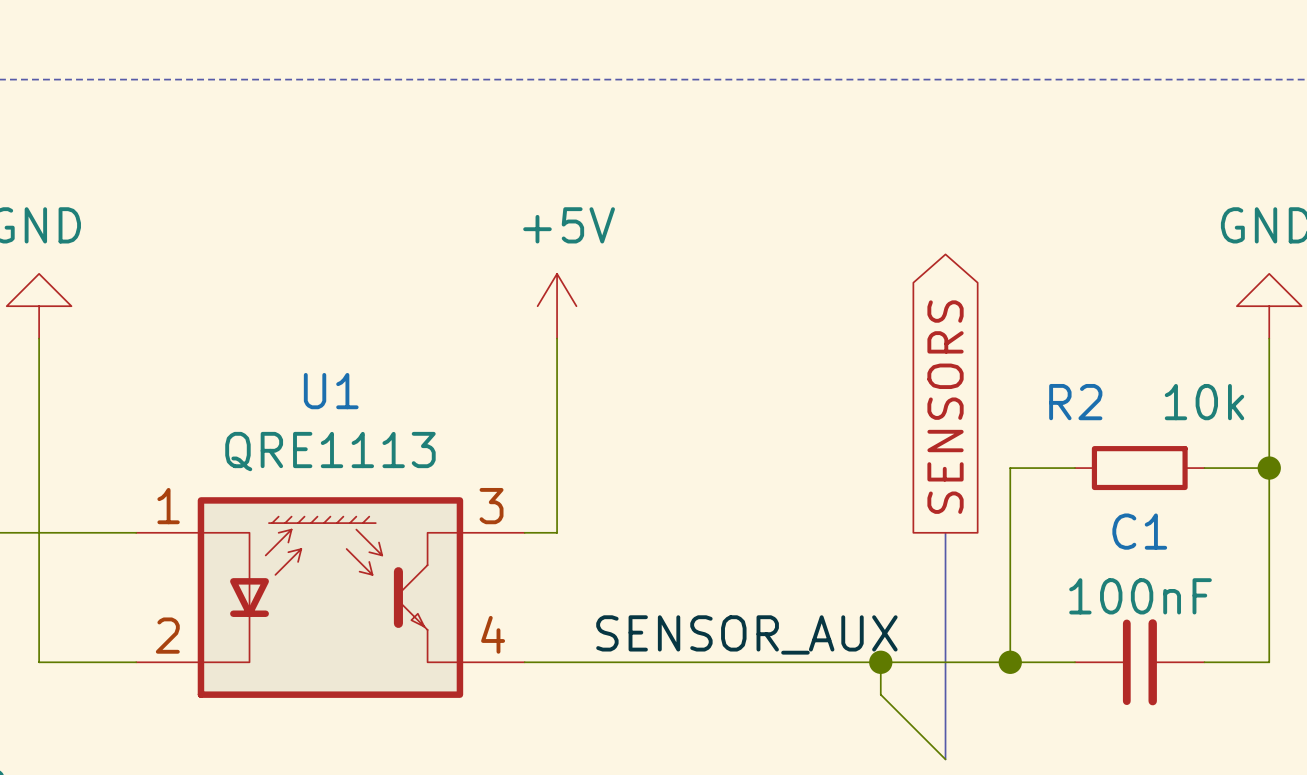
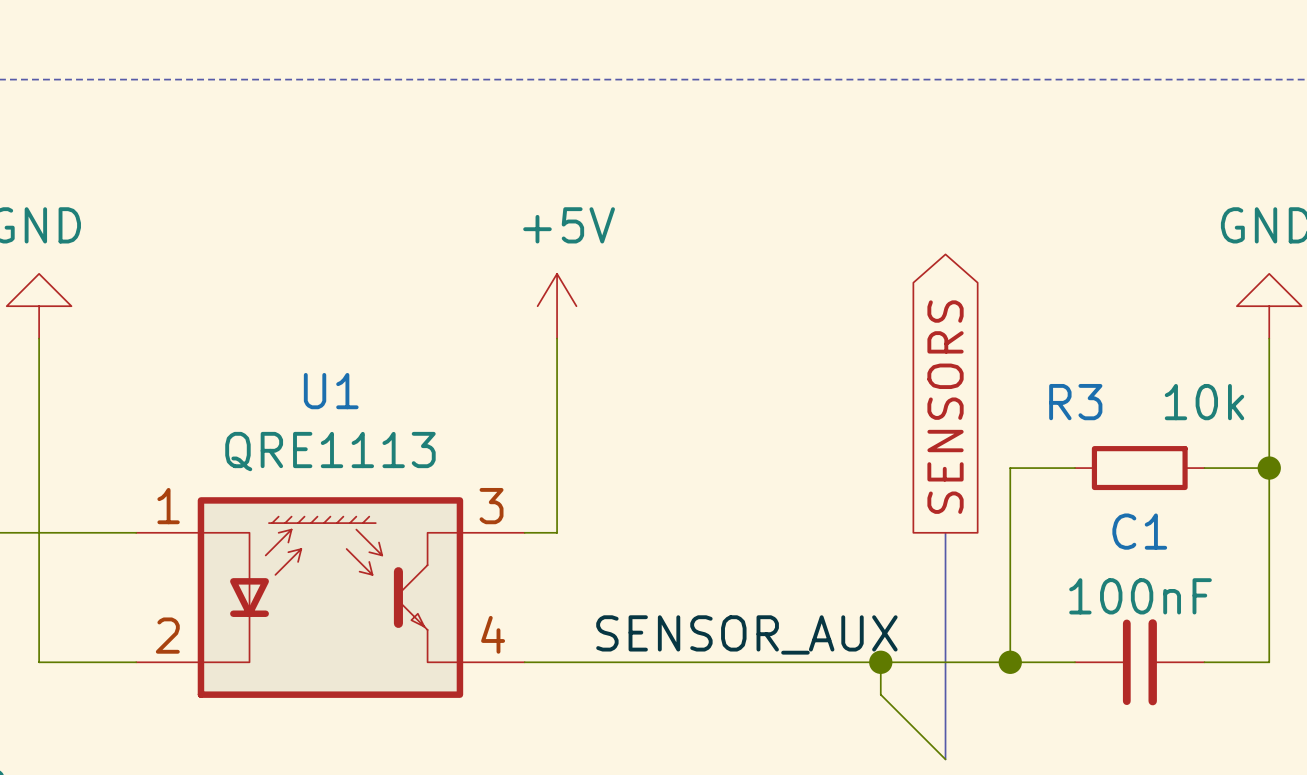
R2 name: R2 (1075, 402) -> R3 (1075, 402)

